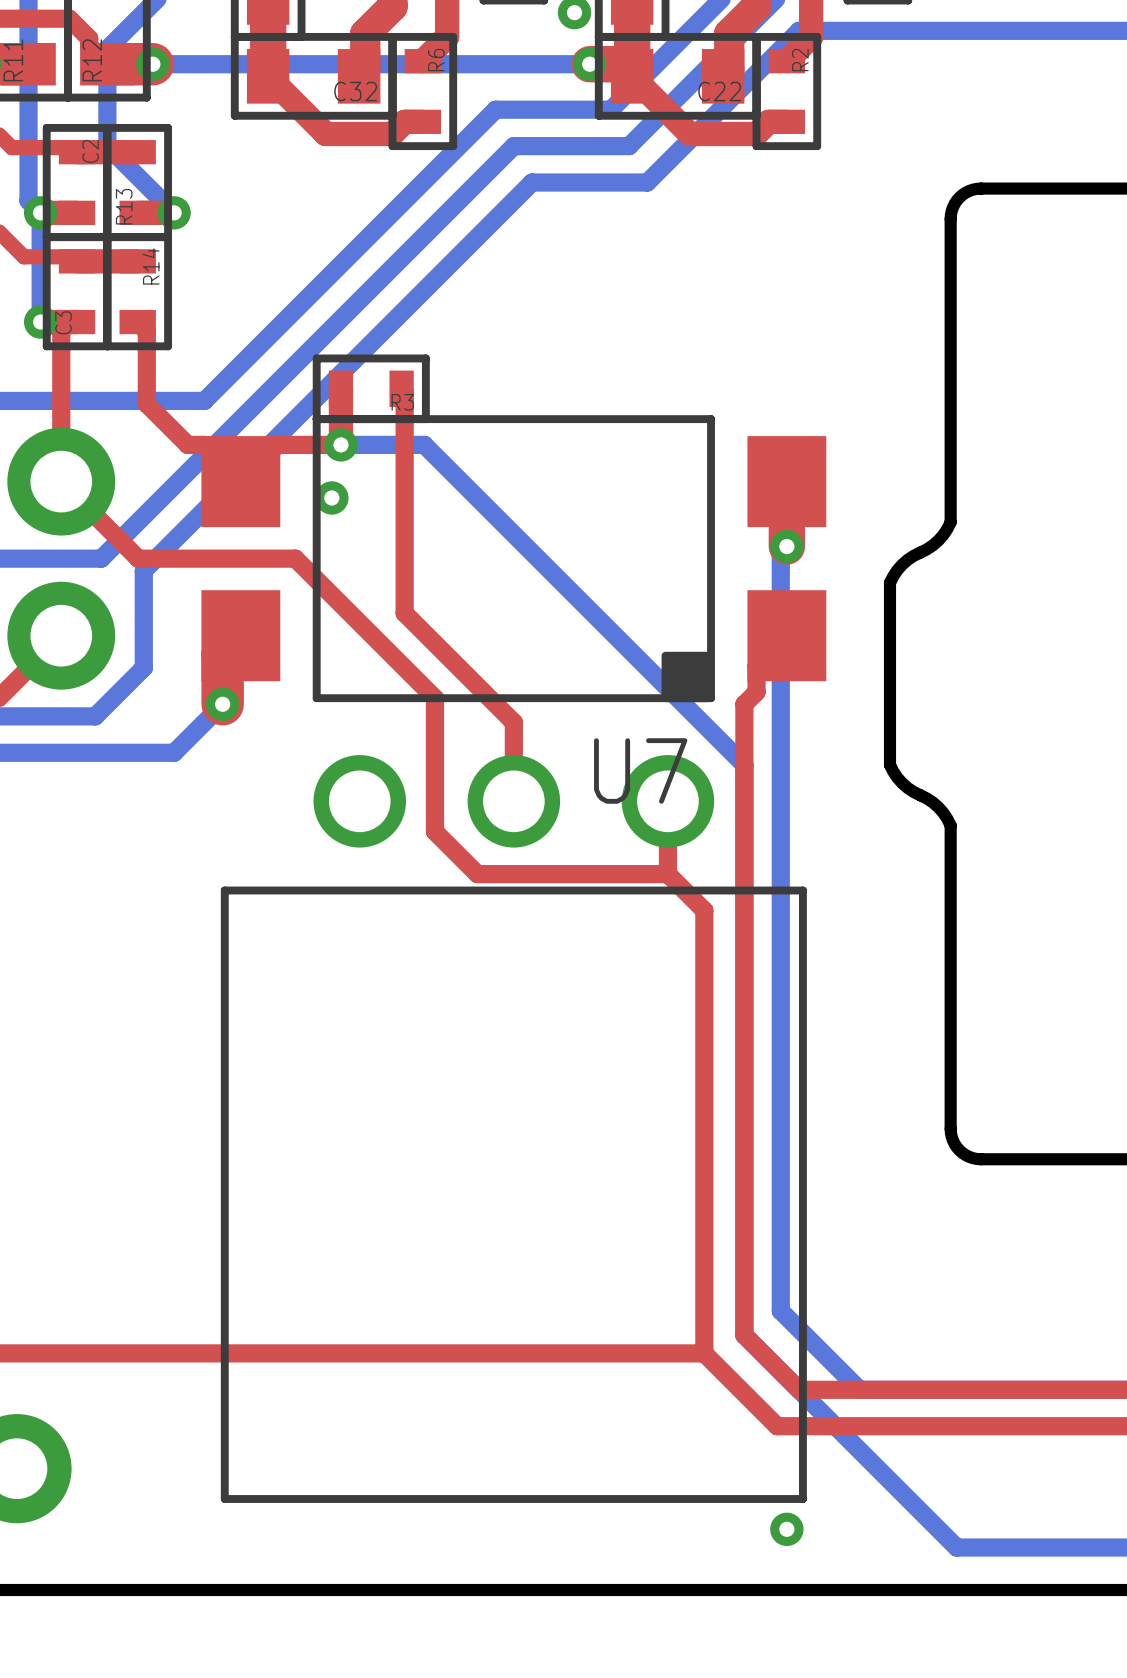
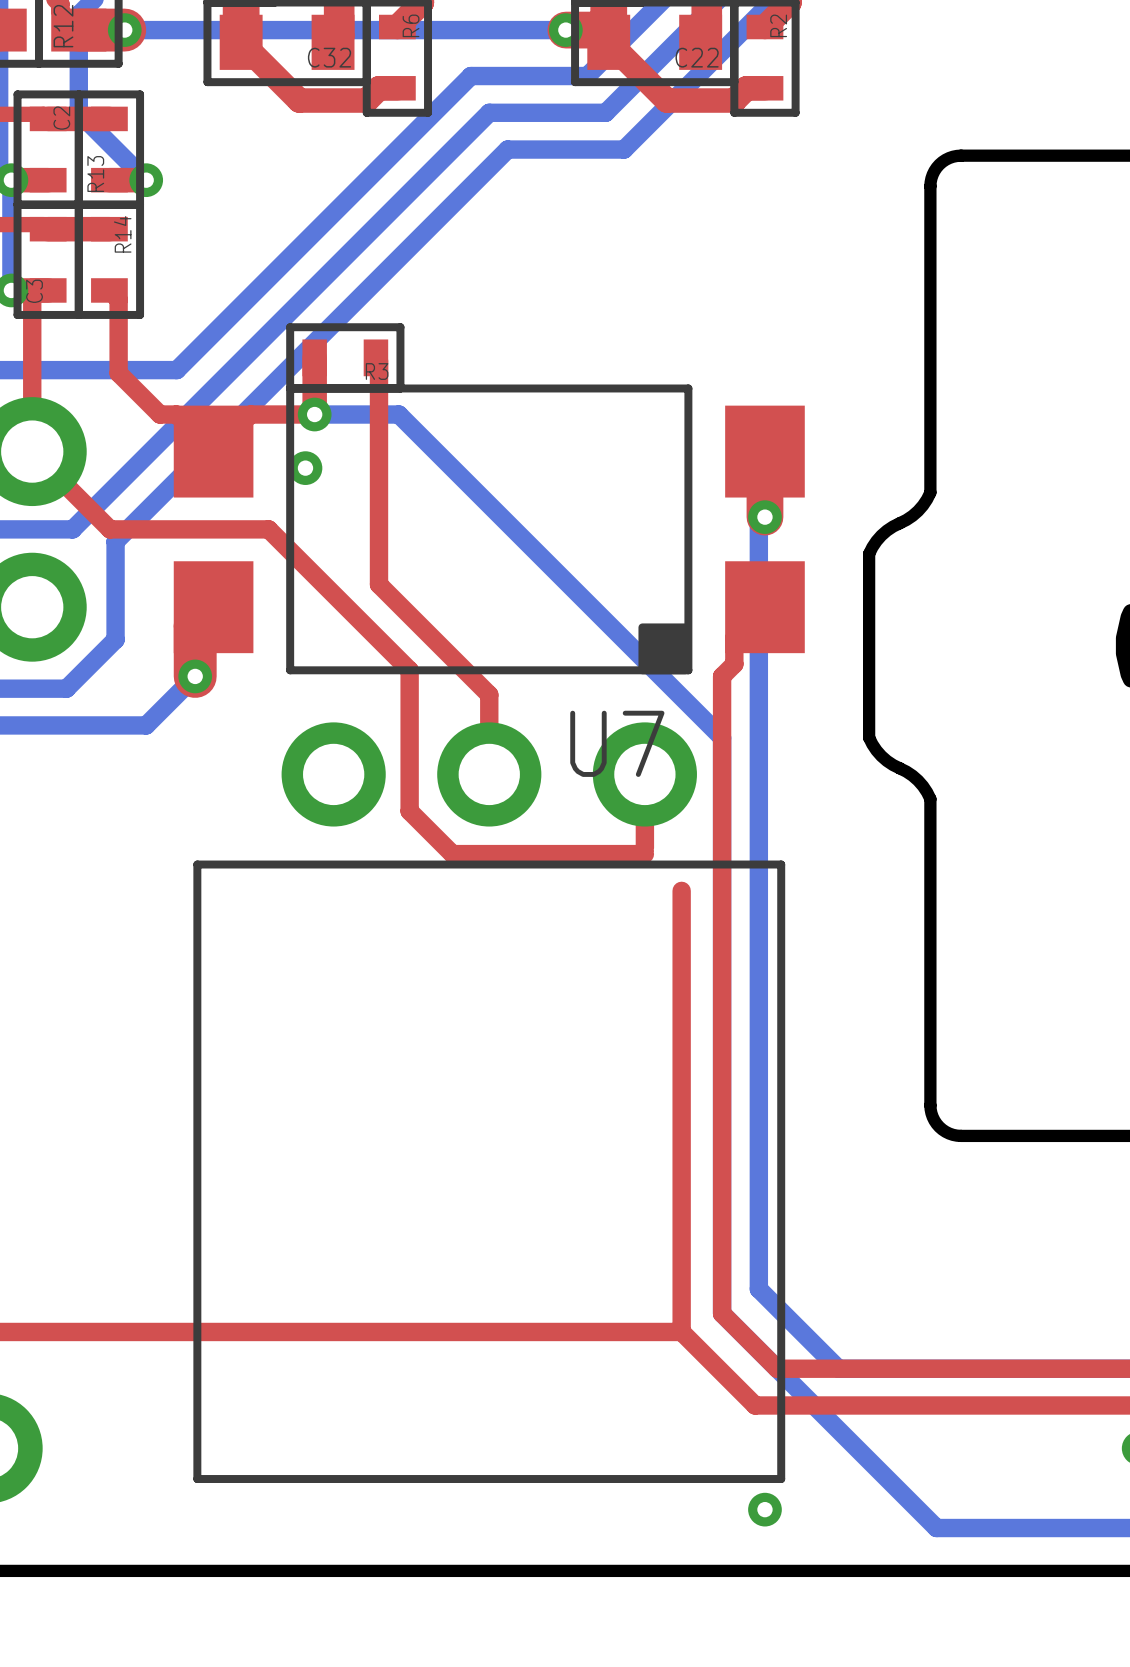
part footprint: [220, 755, 807, 1503] -> [193, 722, 786, 1483]
top track: (434, 831) (477, 874) (667, 874) (704, 910) (704, 916) -> (409, 805) (409, 811) (452, 854) (644, 854)

